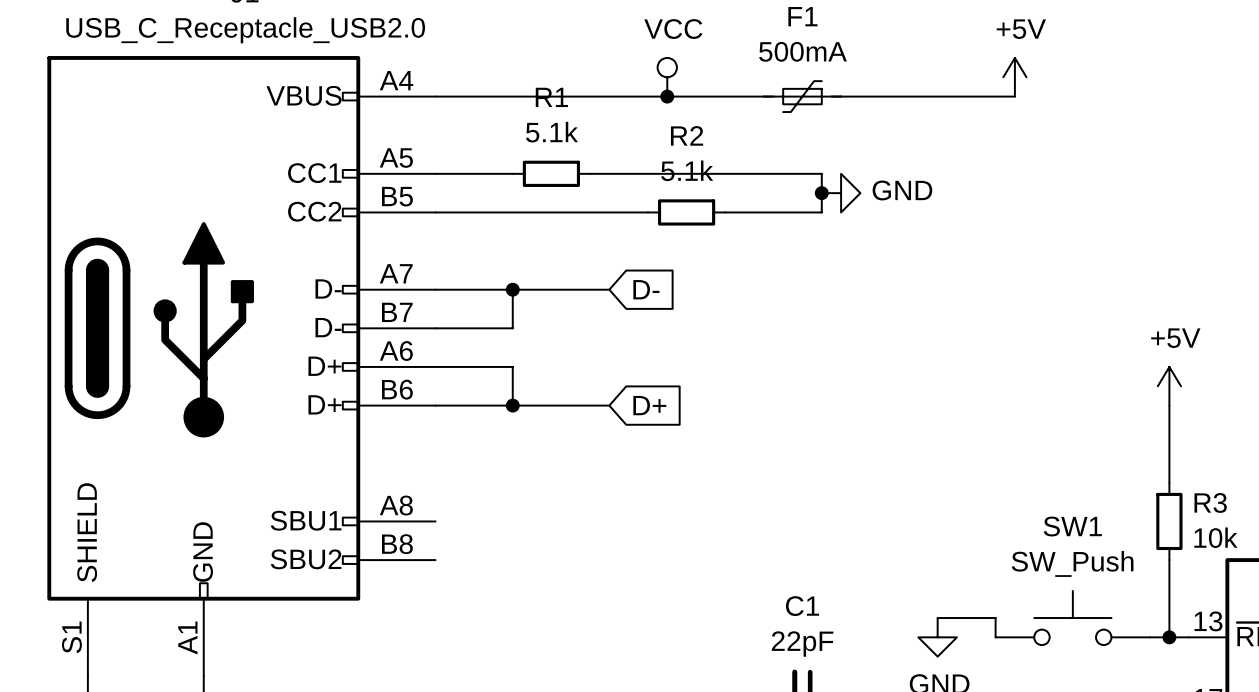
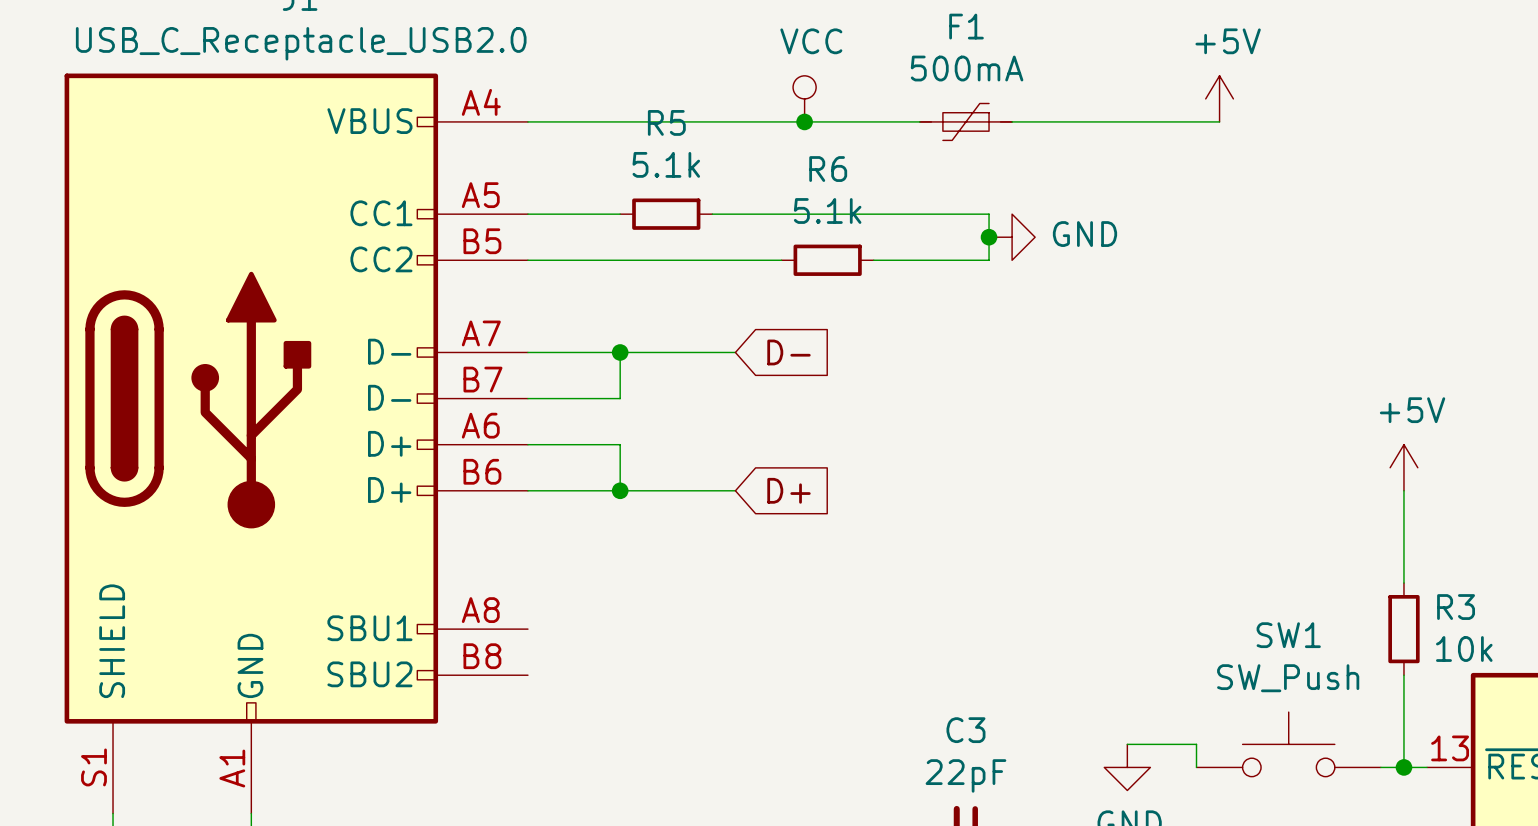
R1 name: R1 (551, 97) -> R5 (666, 122)
R2 name: R2 (687, 135) -> R6 (828, 169)
C1 name: C1 (802, 606) -> C3 (965, 730)

